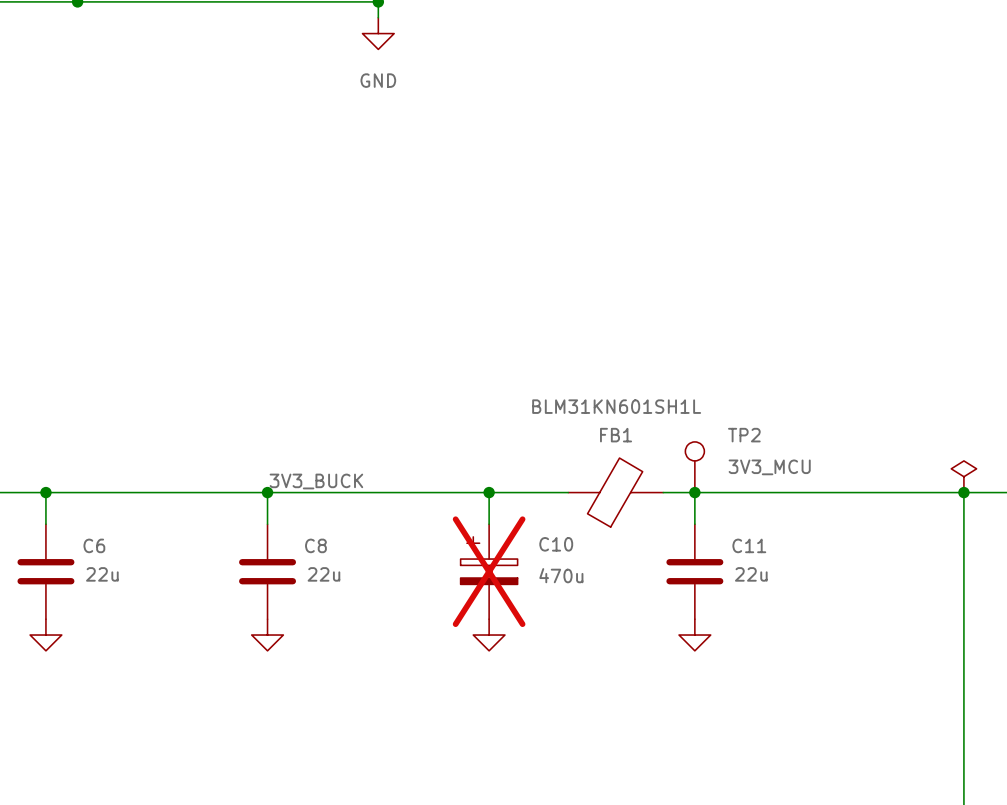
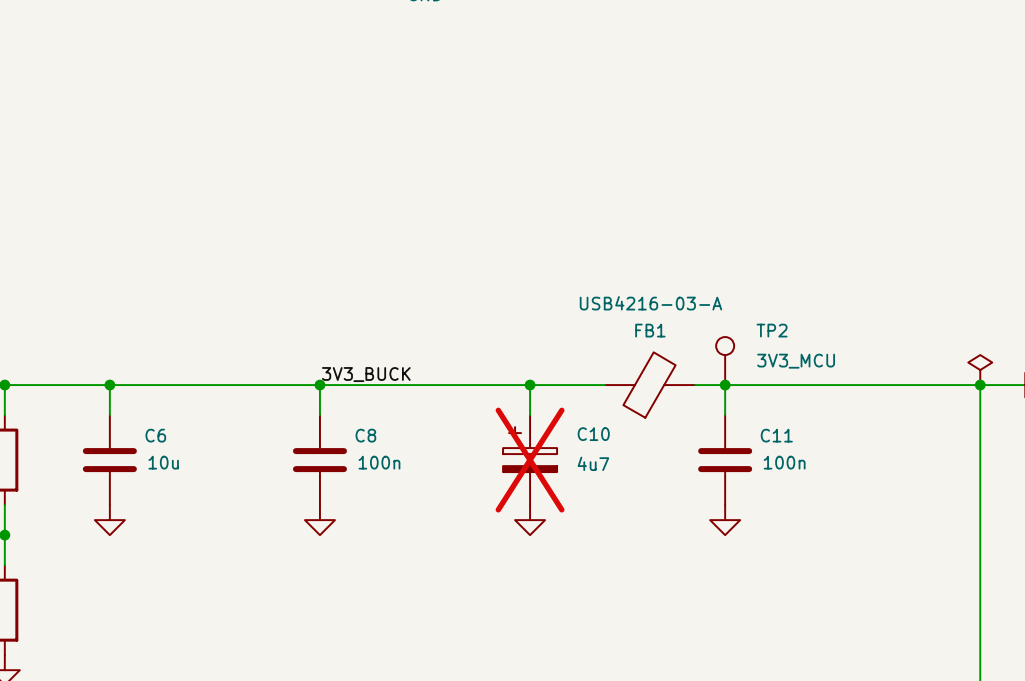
FB1 value: BLM31KN601SH1L (616, 406) -> USB4216-03-A (650, 303)
C6 value: 22u (102, 574) -> 10u (163, 462)
C8 value: 22u (323, 574) -> 100n (379, 462)
C11 value: 22u (751, 574) -> 100n (784, 462)
C10 value: 470u (561, 575) -> 4u7 (593, 463)

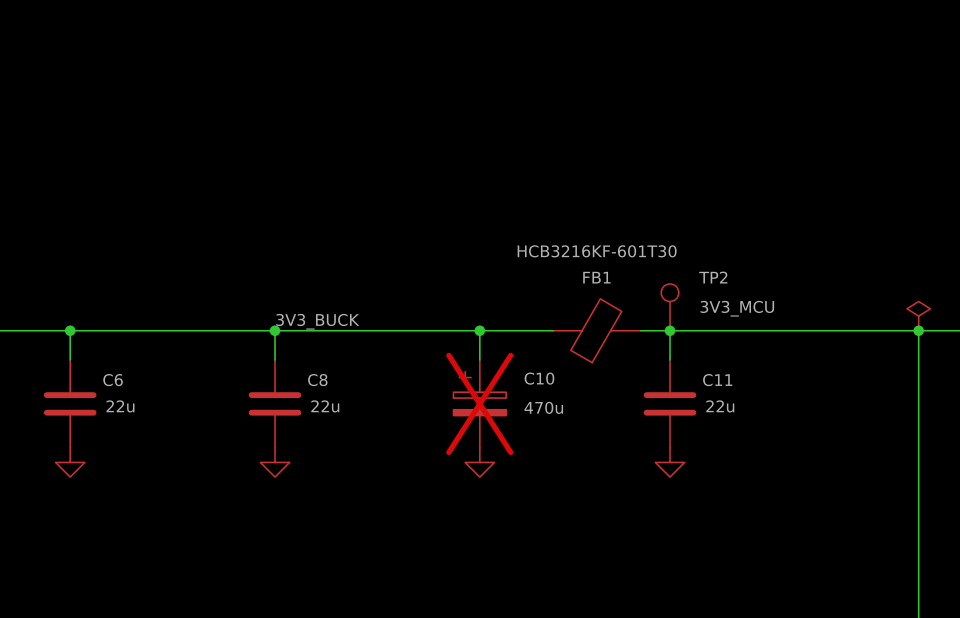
FB1 value: USB4216-03-A (650, 303) -> HCB3216KF-601T30 (597, 251)
C6 value: 10u (163, 462) -> 22u (120, 406)
C8 value: 100n (379, 462) -> 22u (325, 406)
C11 value: 100n (784, 462) -> 22u (720, 406)
C10 value: 4u7 (593, 463) -> 470u (543, 407)

